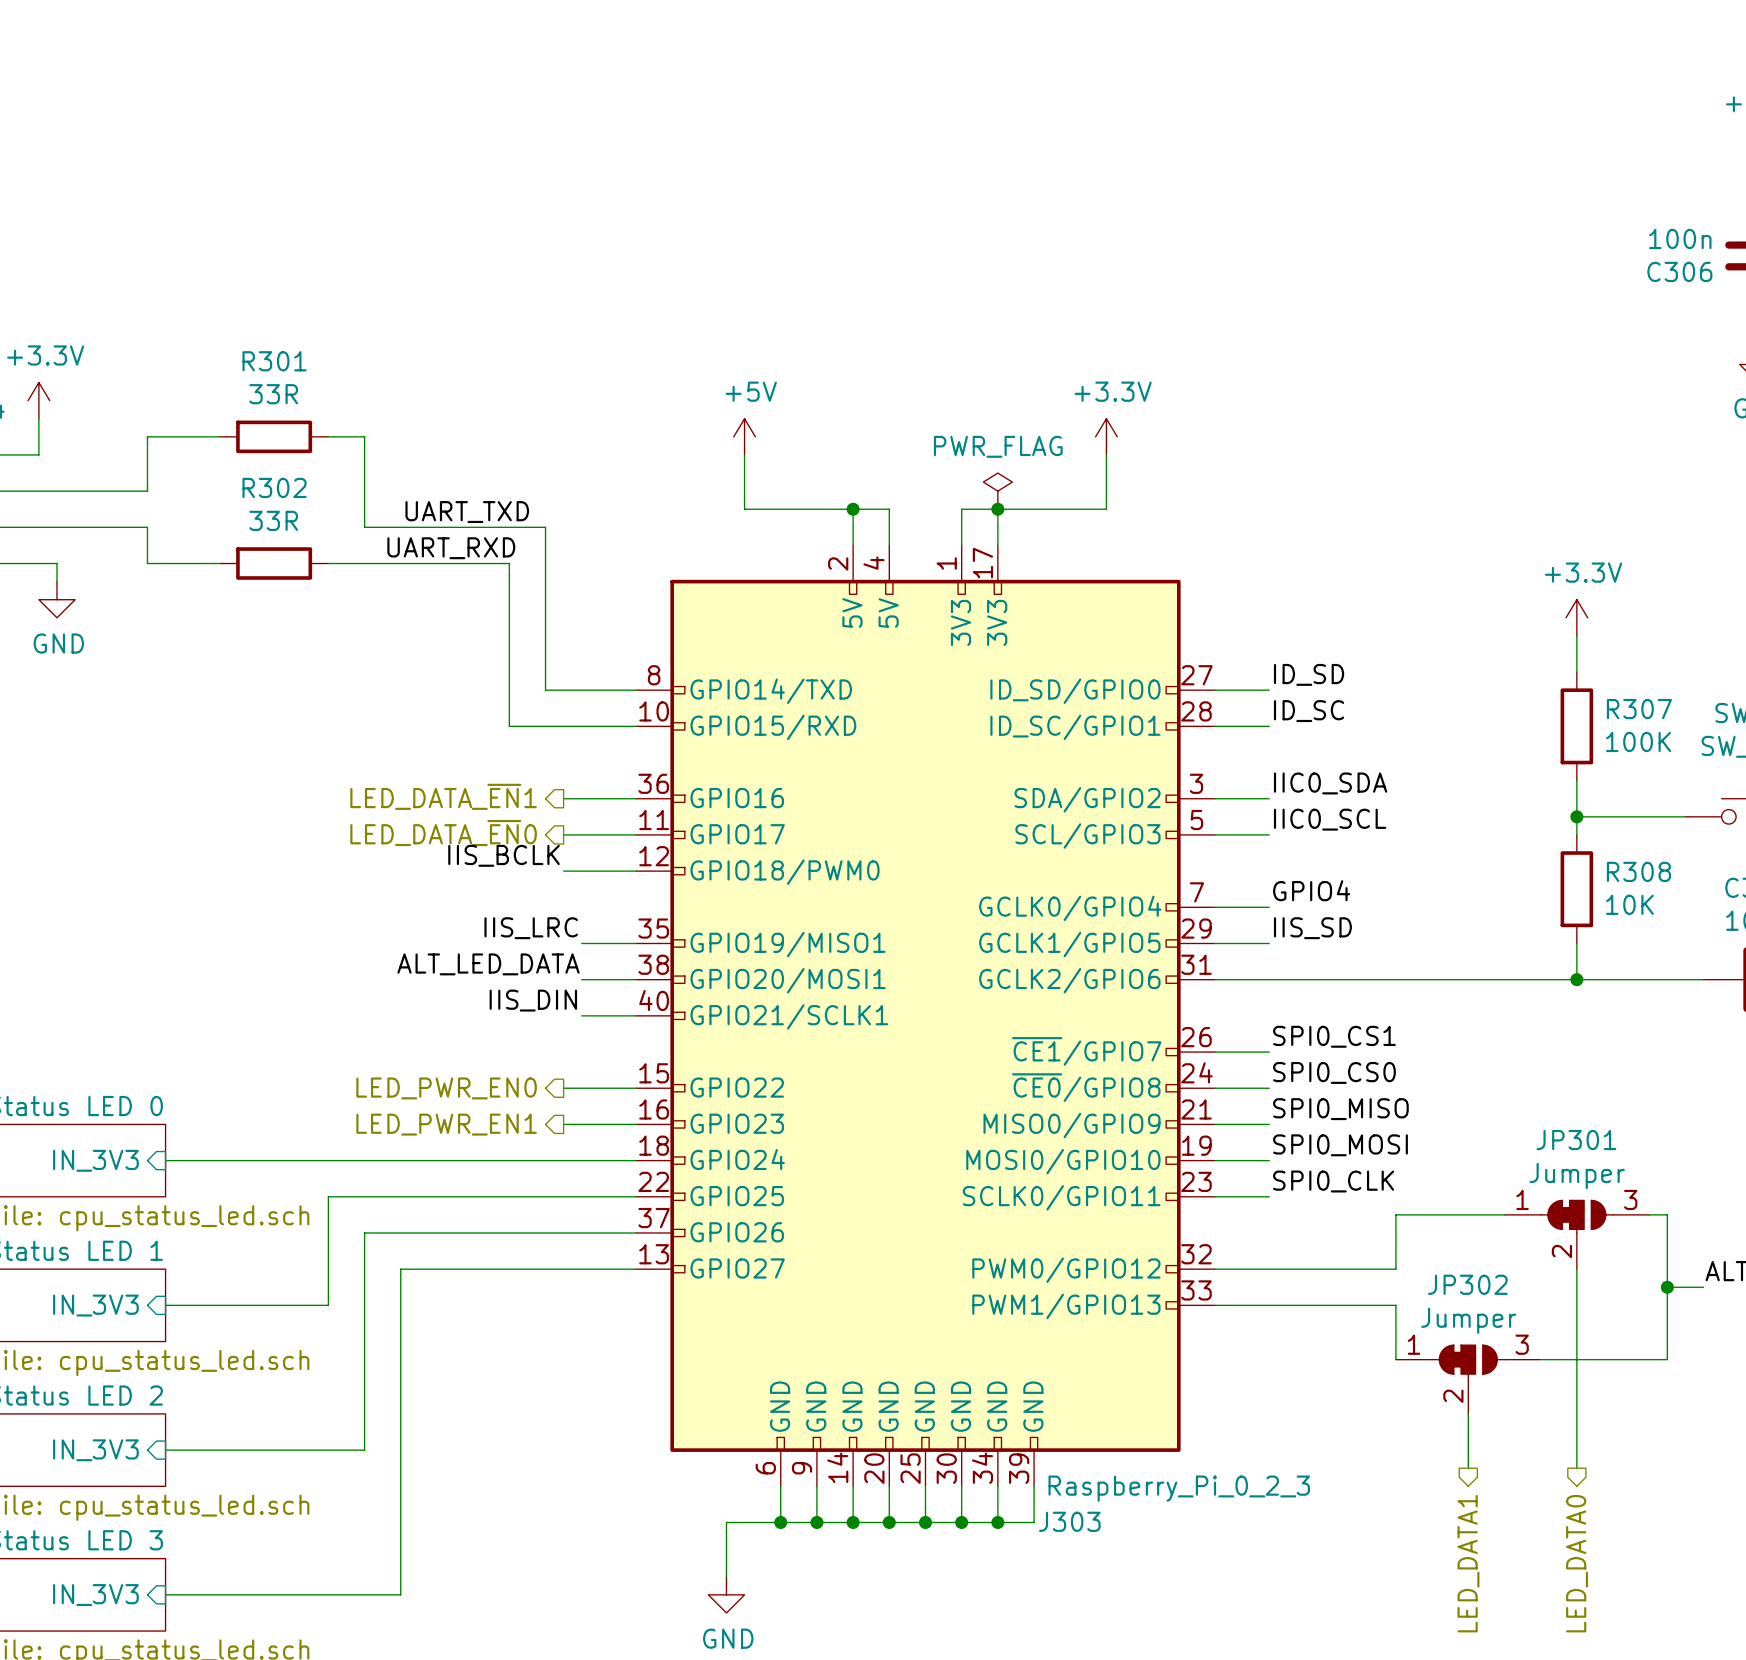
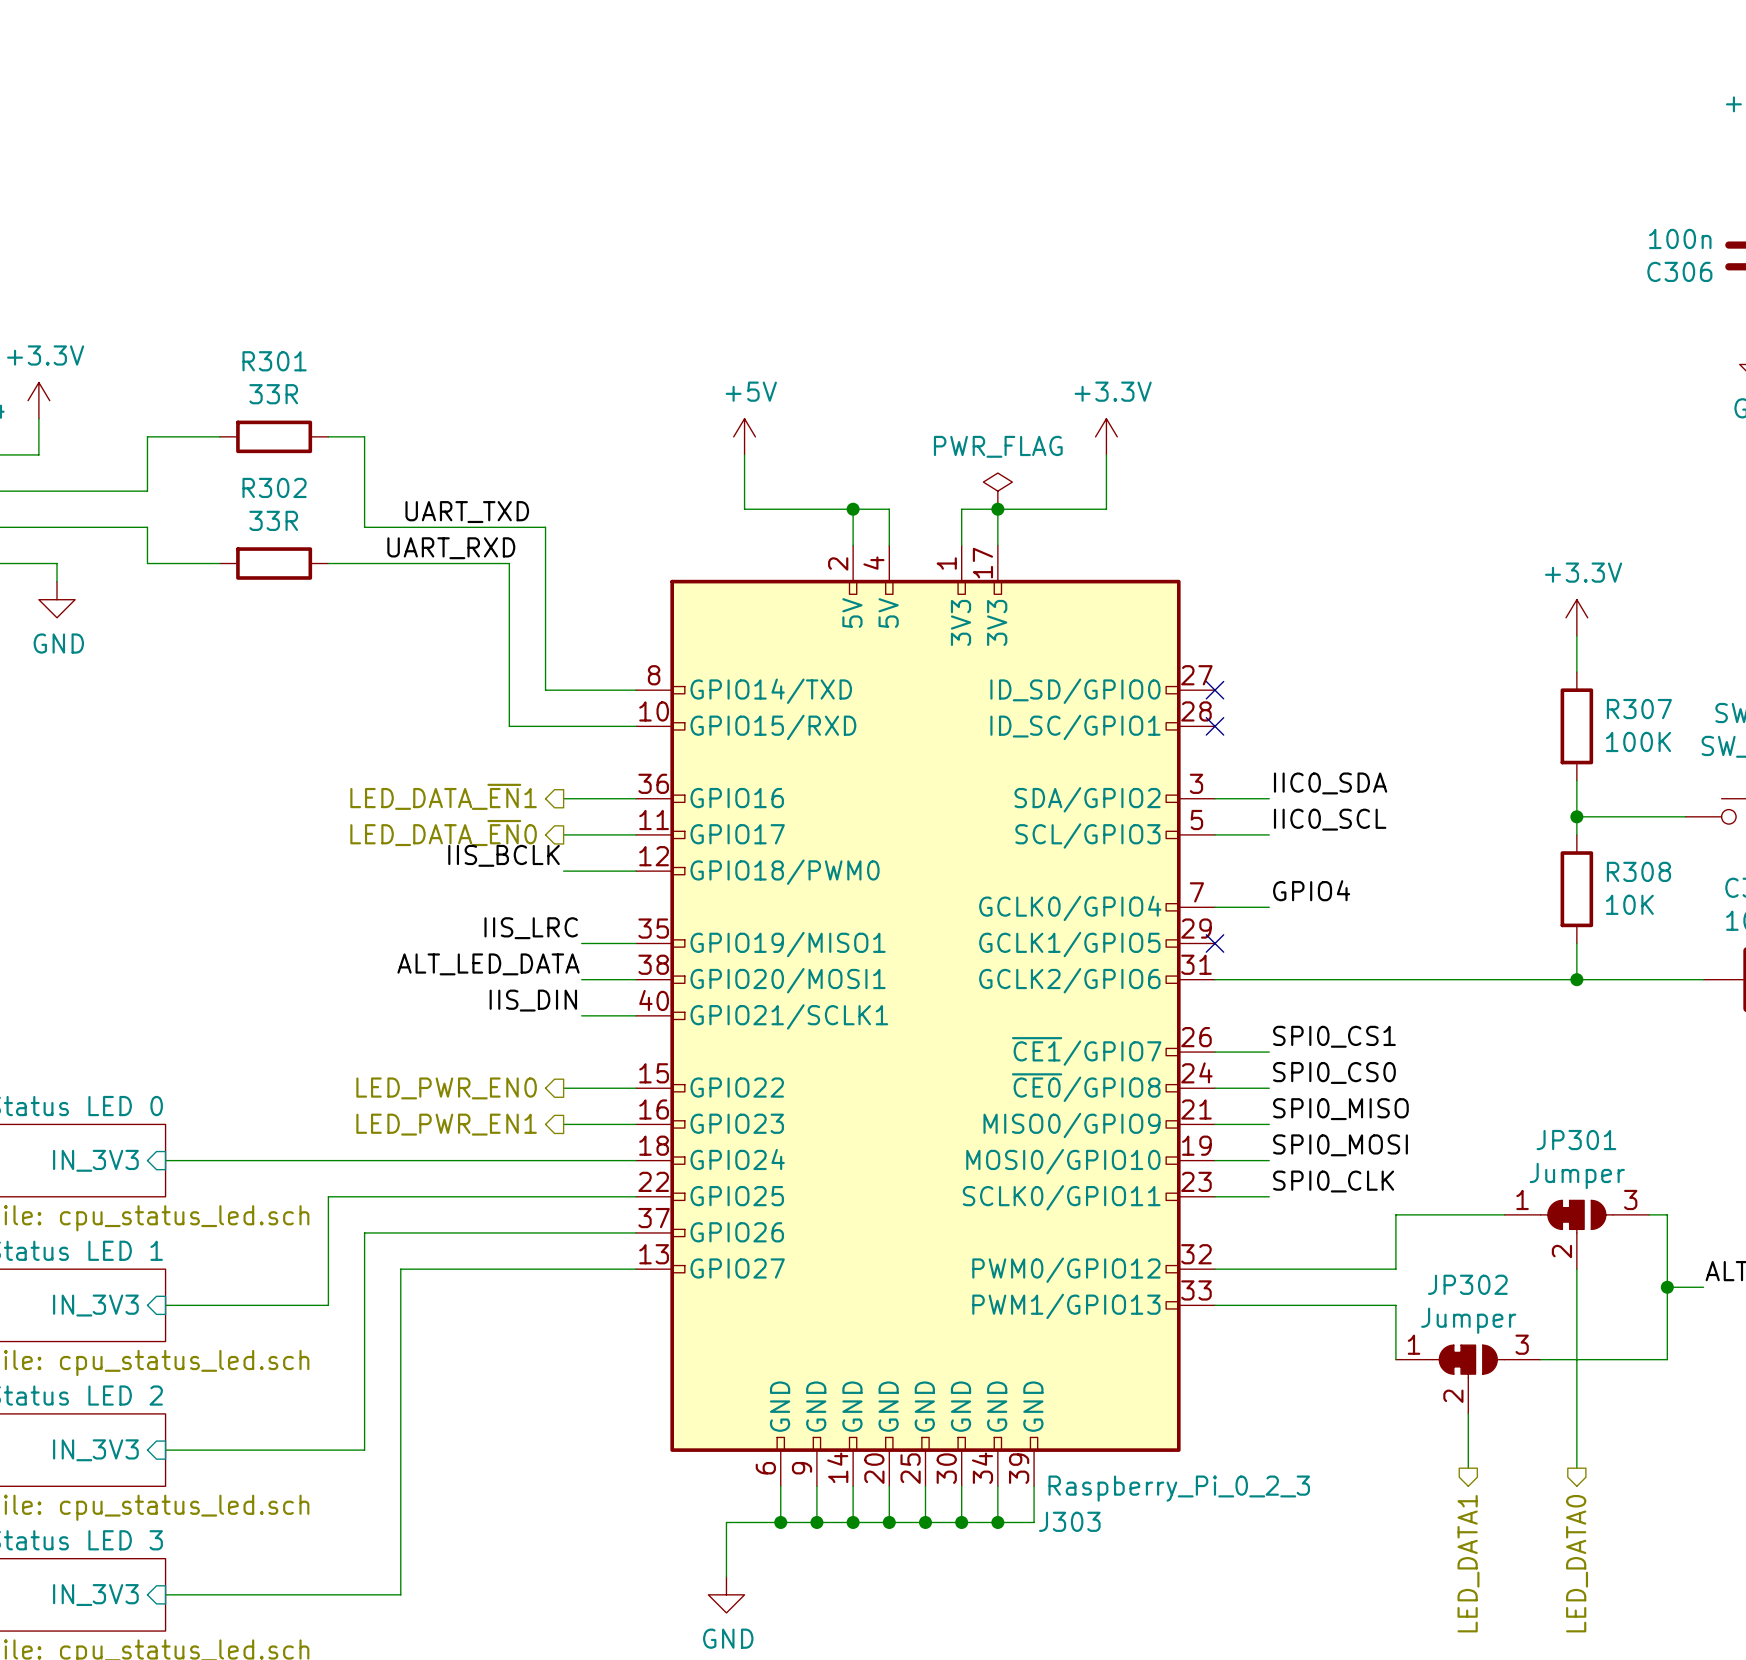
label: ID_SD (1309, 674) -> none
wire: (1214, 690) (1269, 690) -> none
no-connect mark: none -> (1214, 690)
label: ID_SC (1309, 711) -> none
wire: (1214, 726) (1269, 726) -> none
no-connect mark: none -> (1214, 726)
label: IIS_SD (1312, 928) -> none
wire: (1214, 943) (1269, 943) -> none
no-connect mark: none -> (1214, 943)

